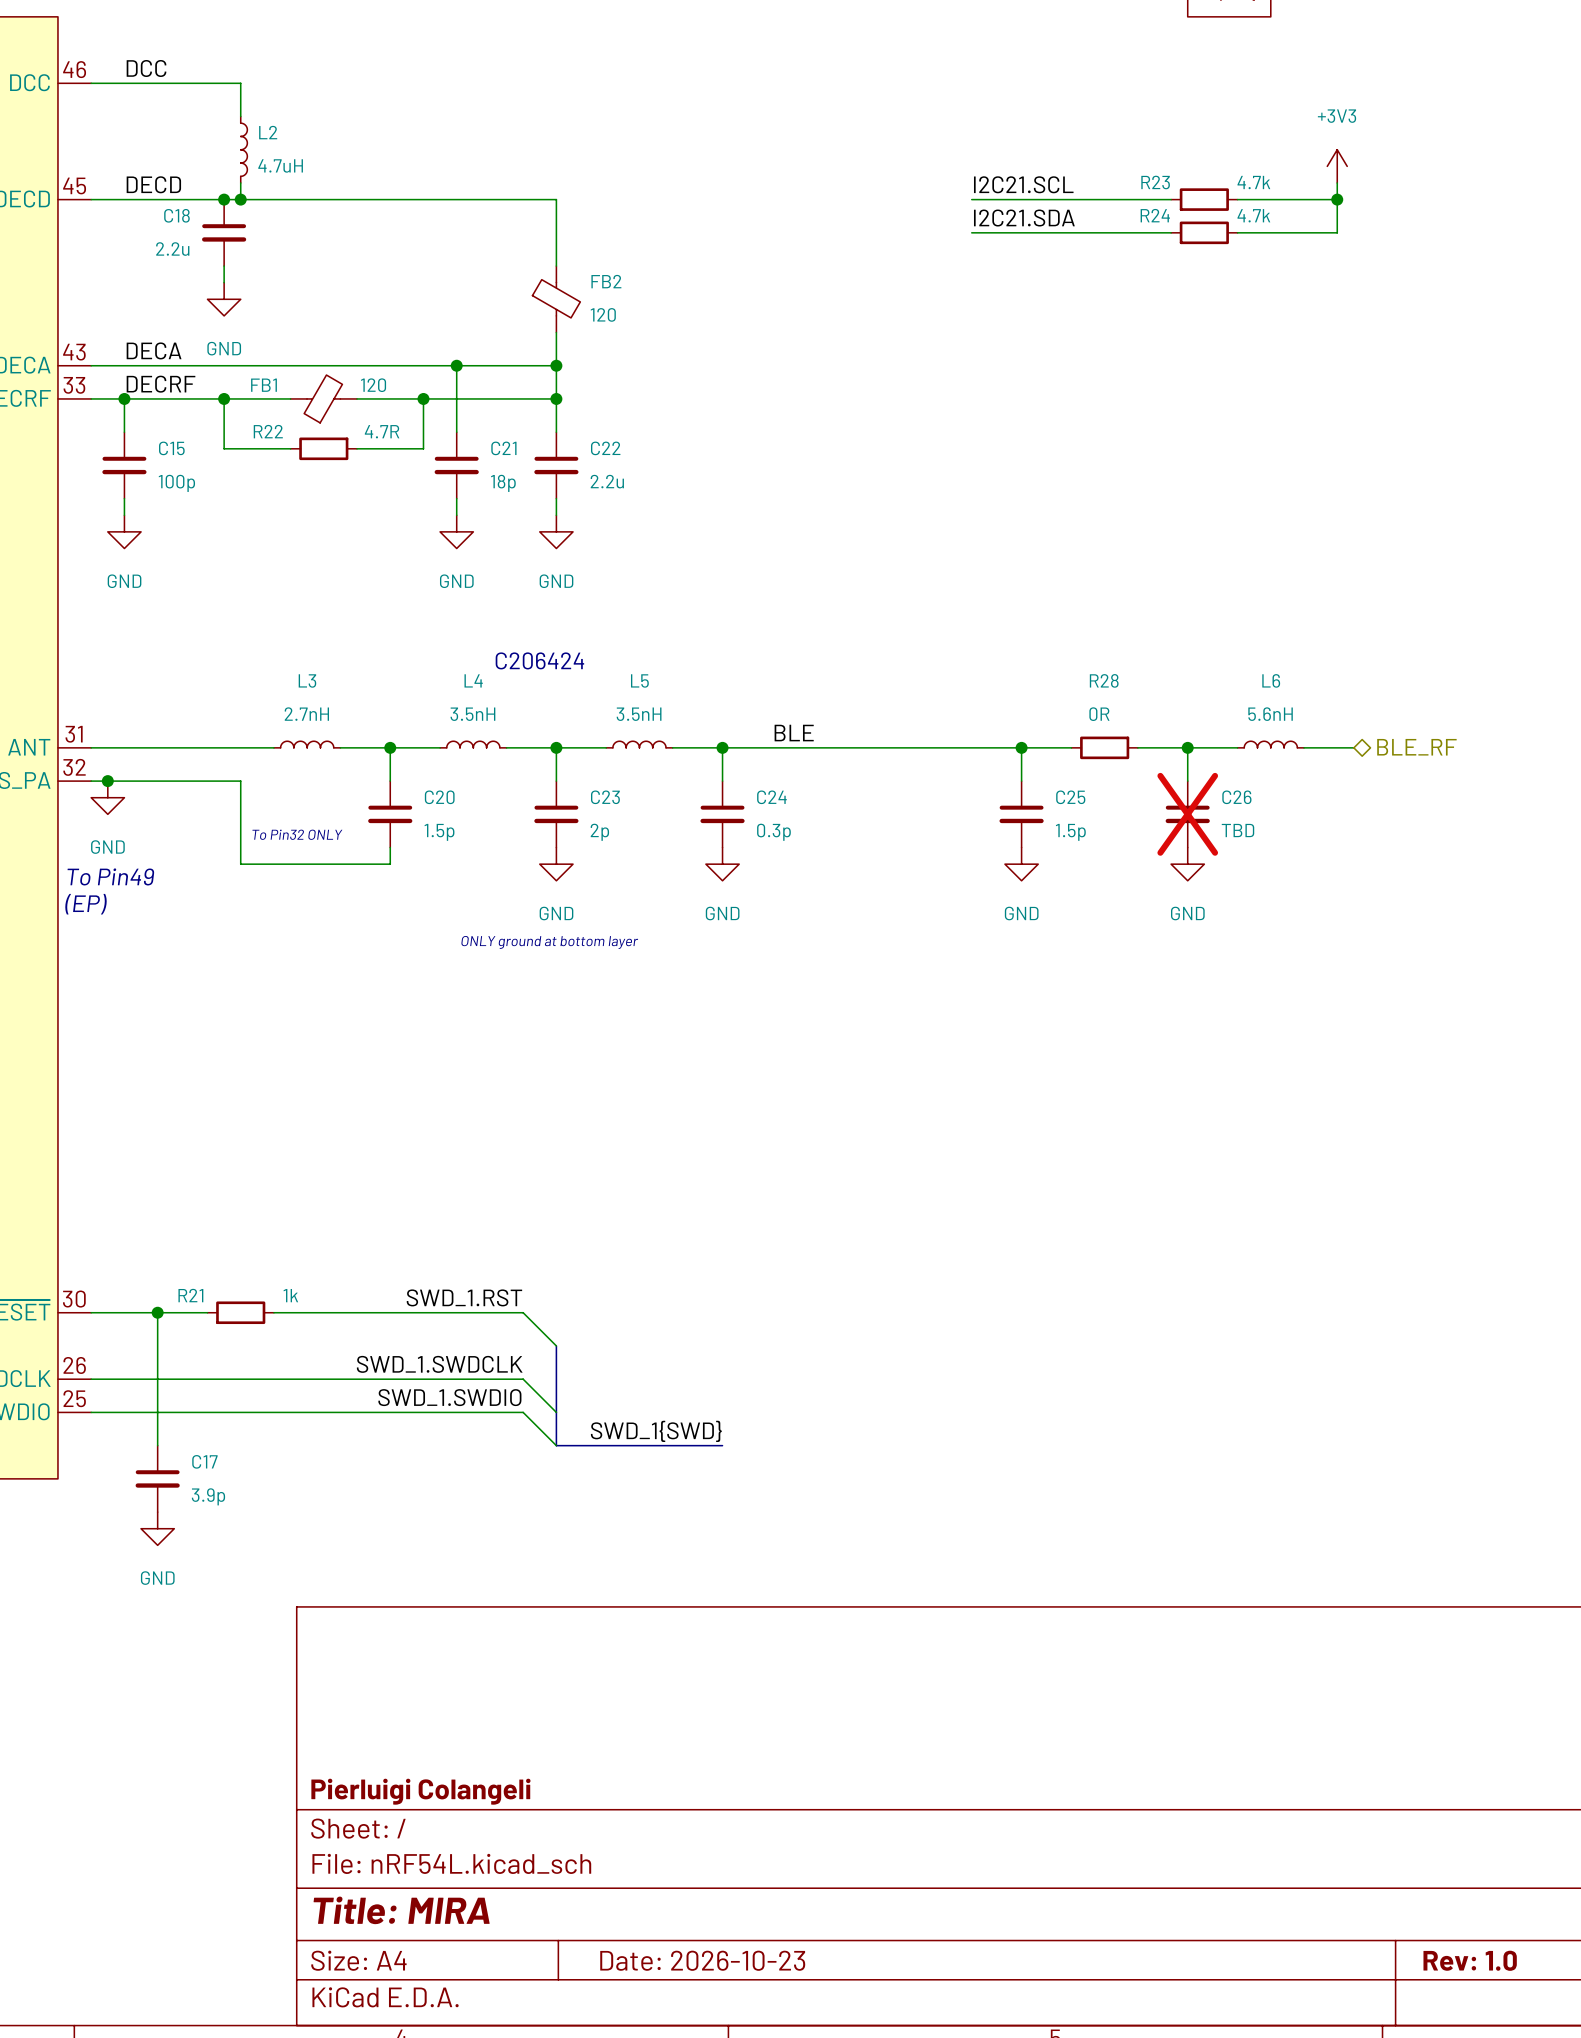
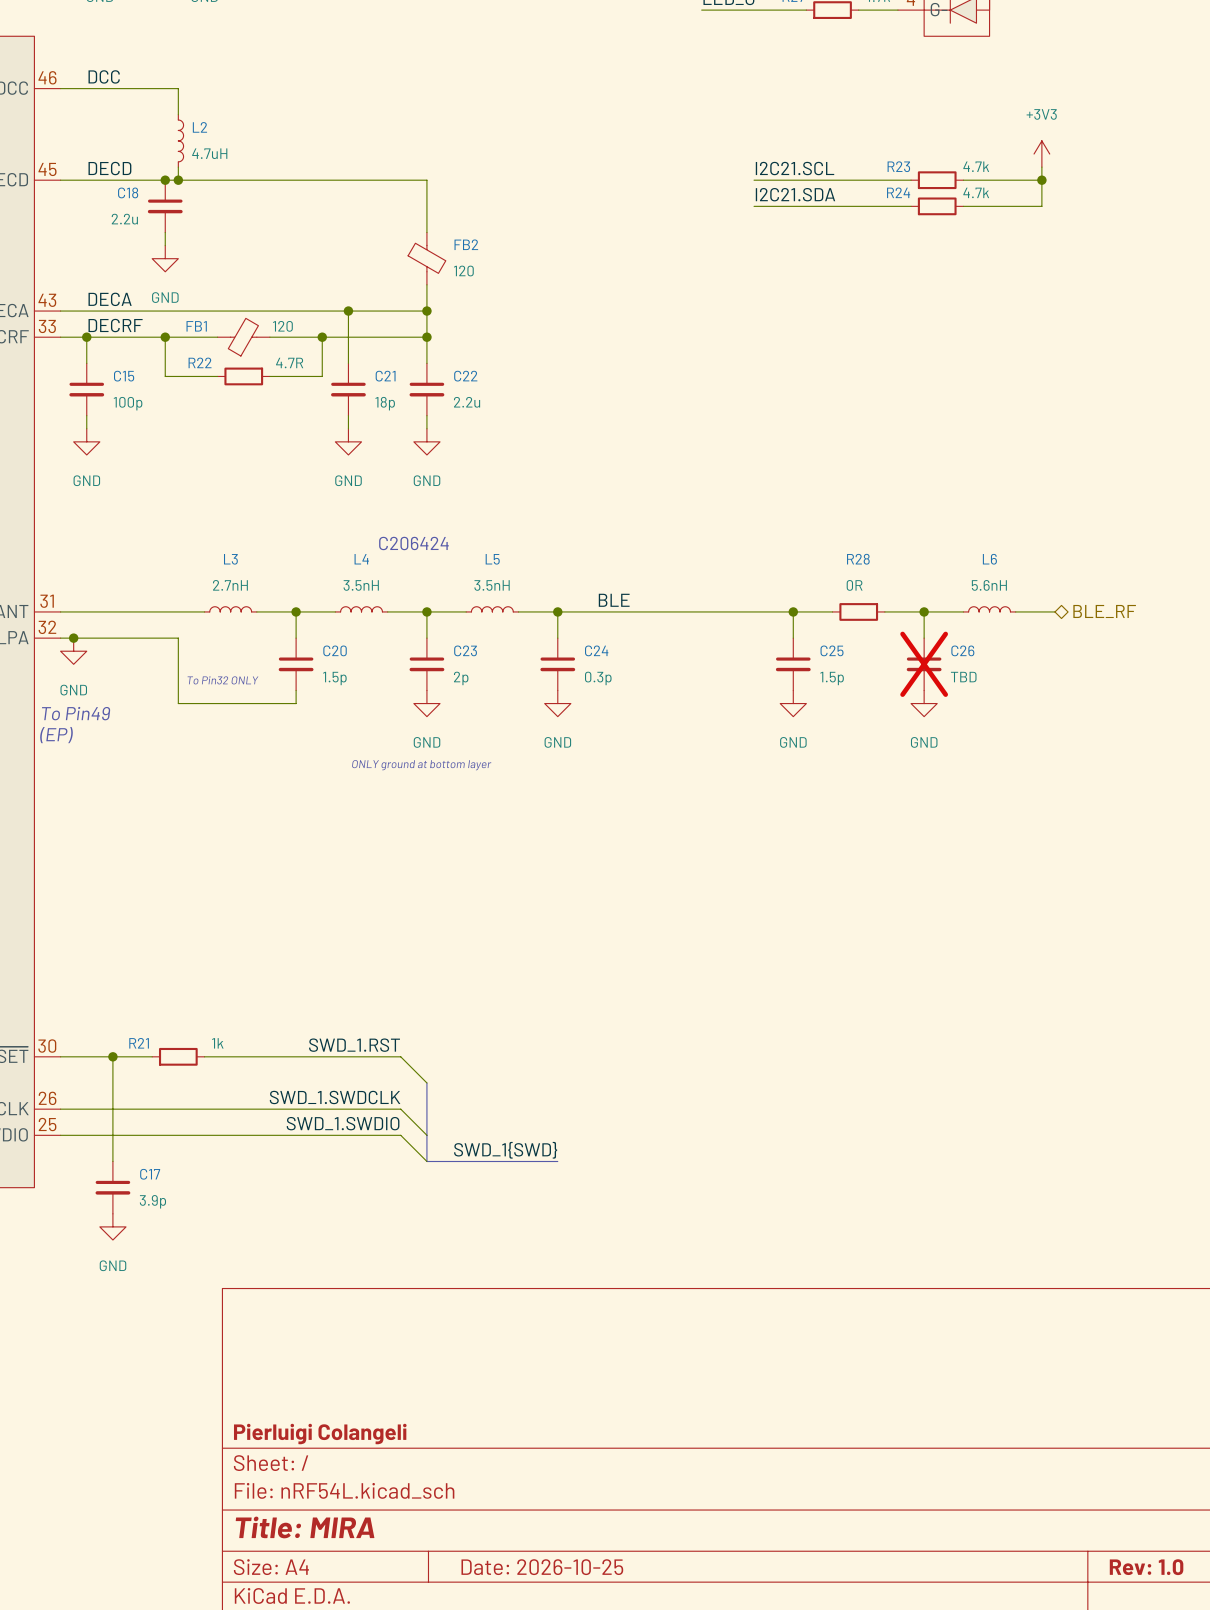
title block: Date: 2026-10-23 (702, 1960) -> Date: 2026-10-25 (542, 1567)

